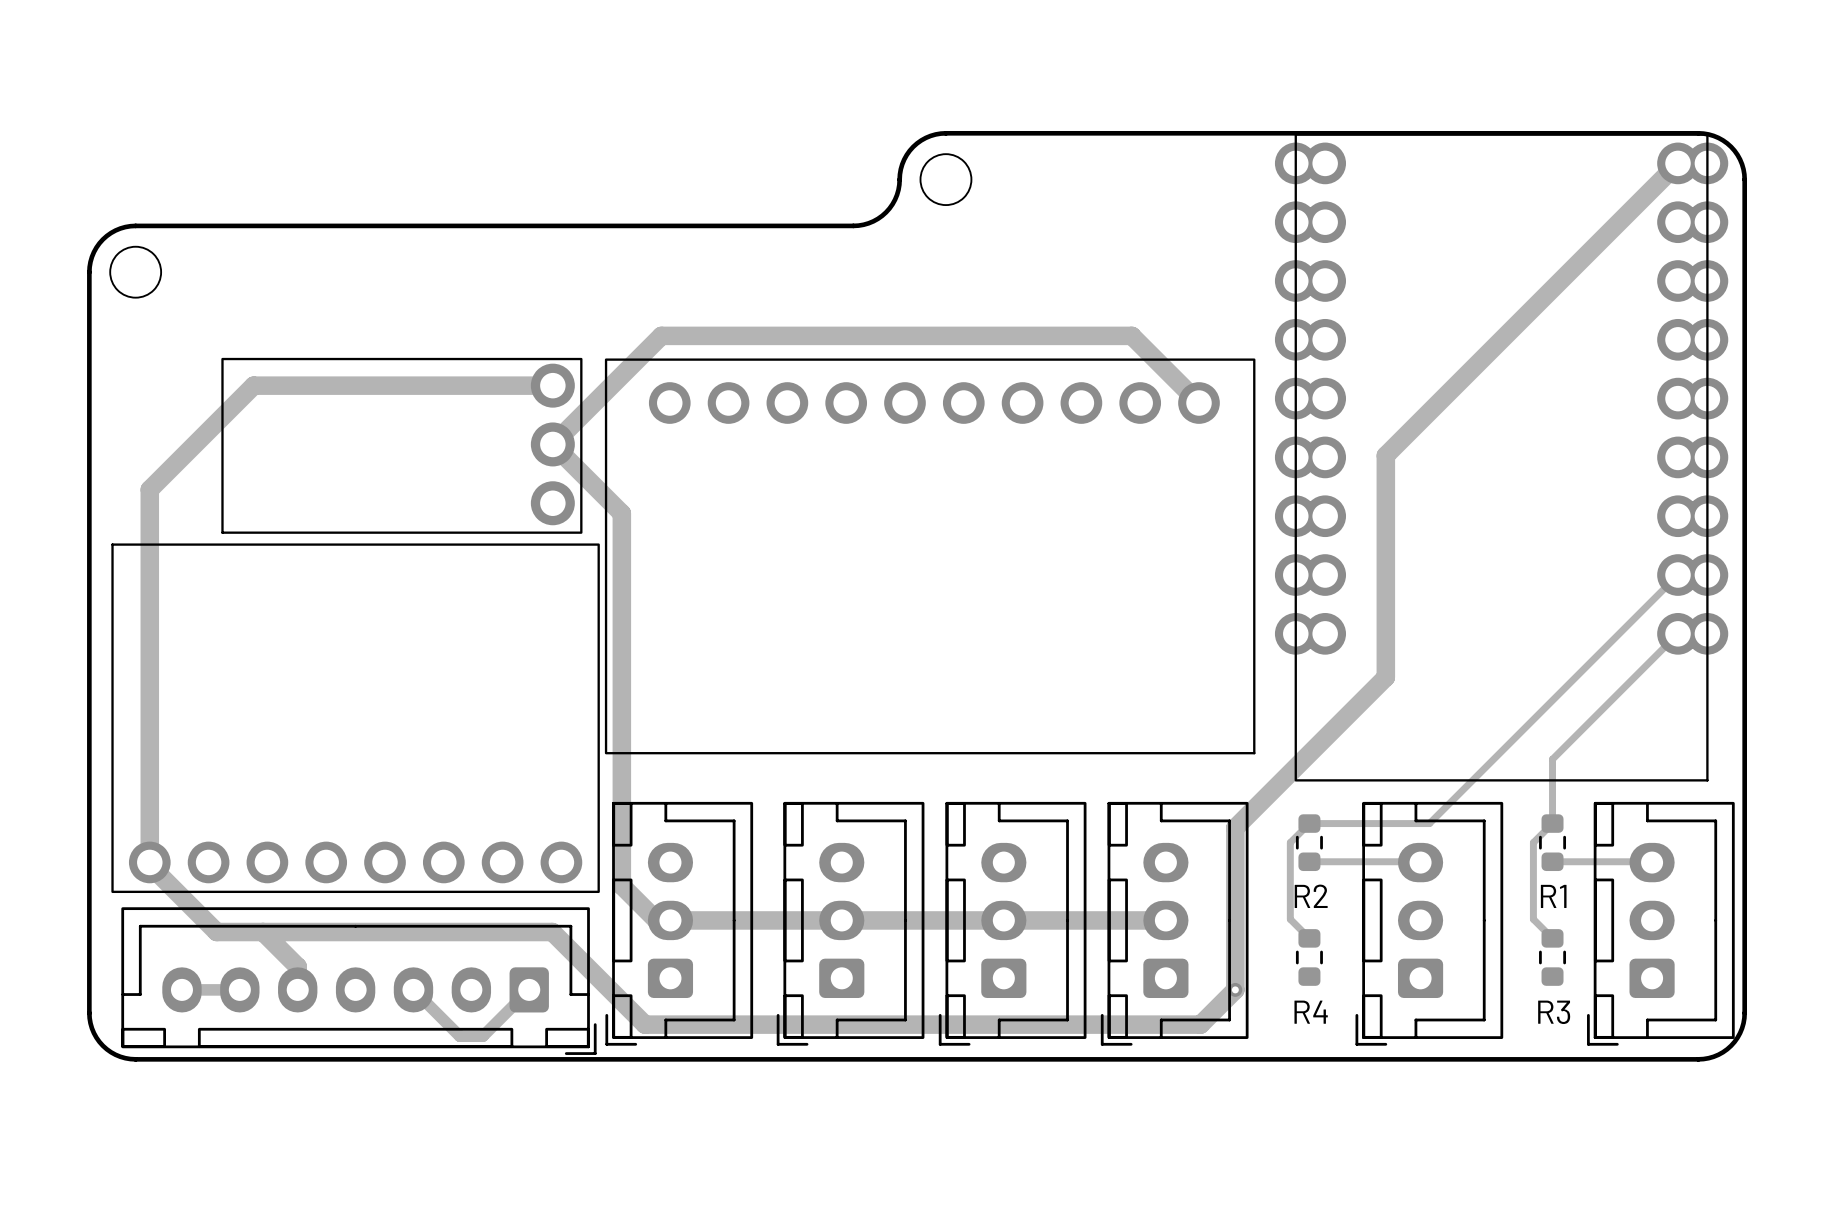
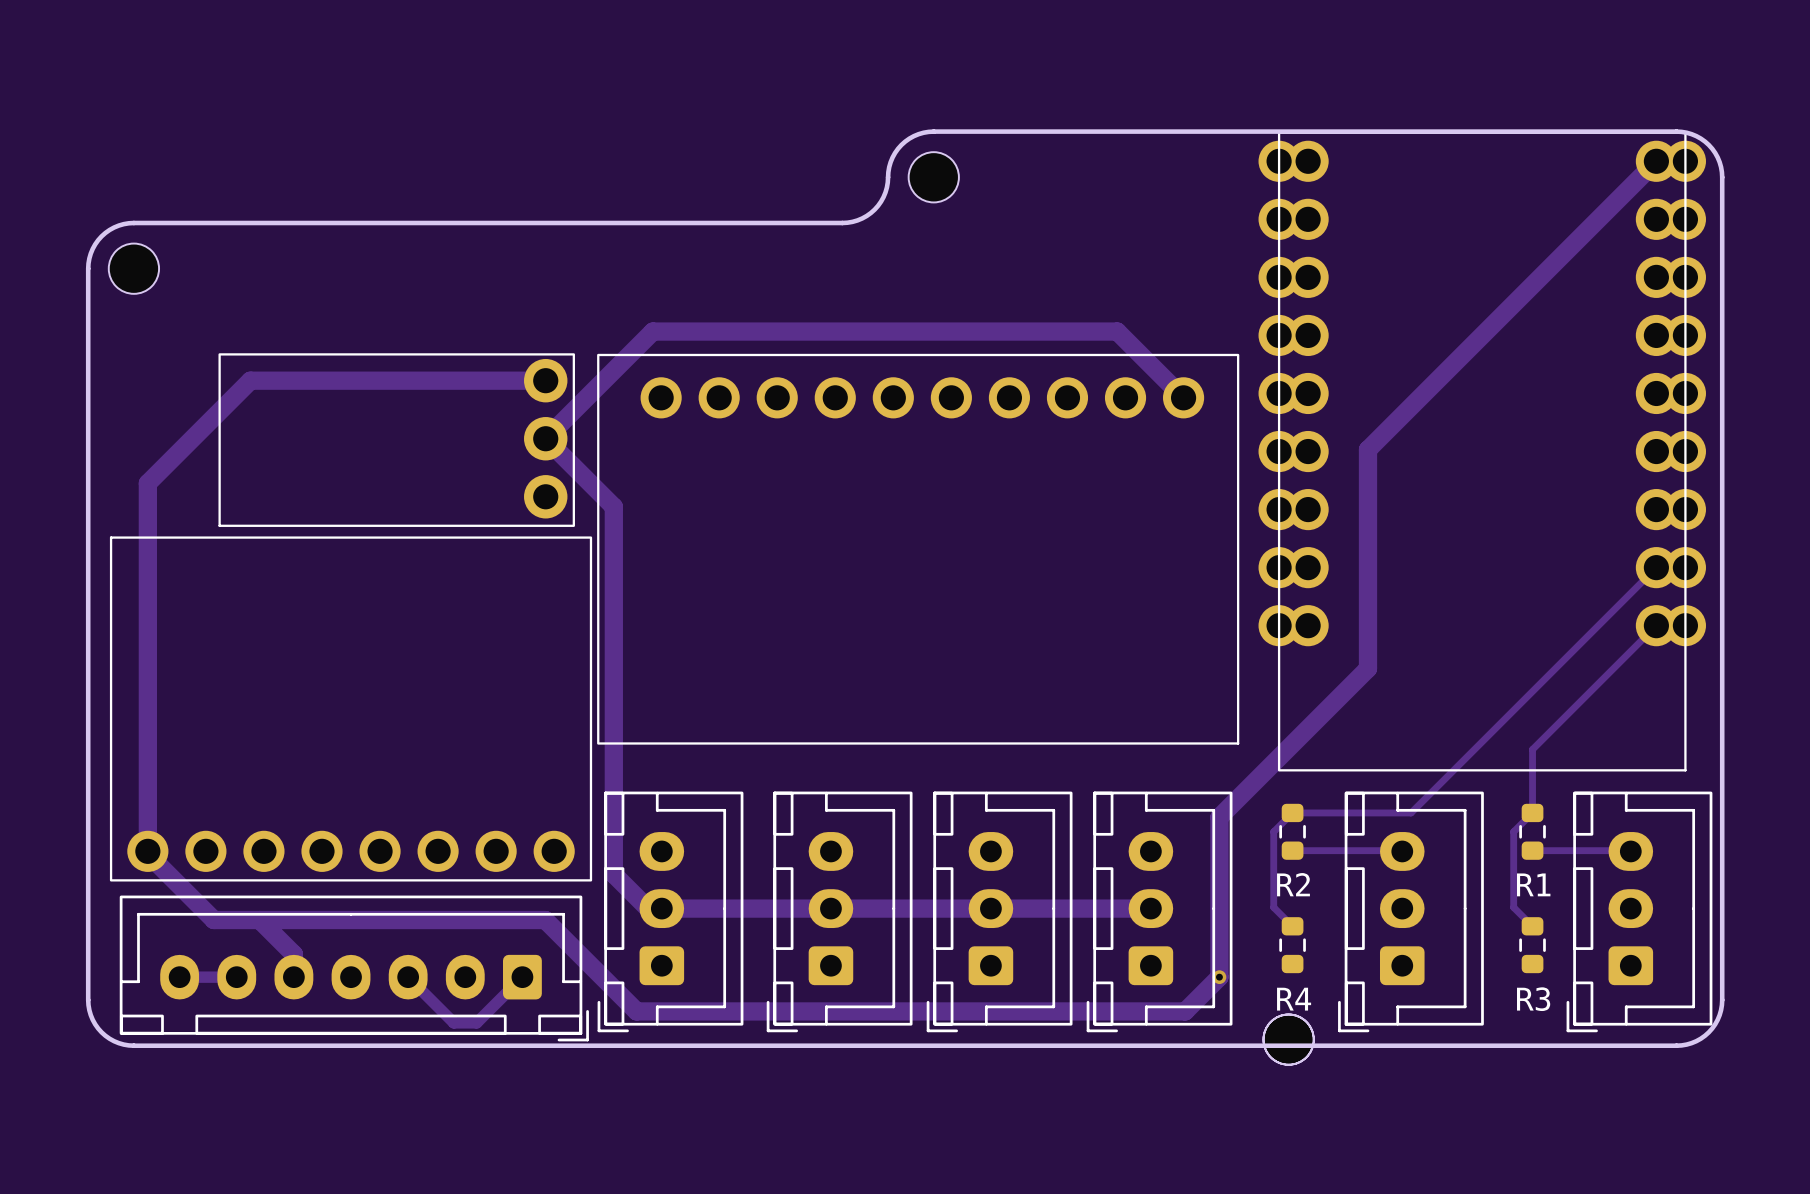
part: none -> (1288, 1039)

